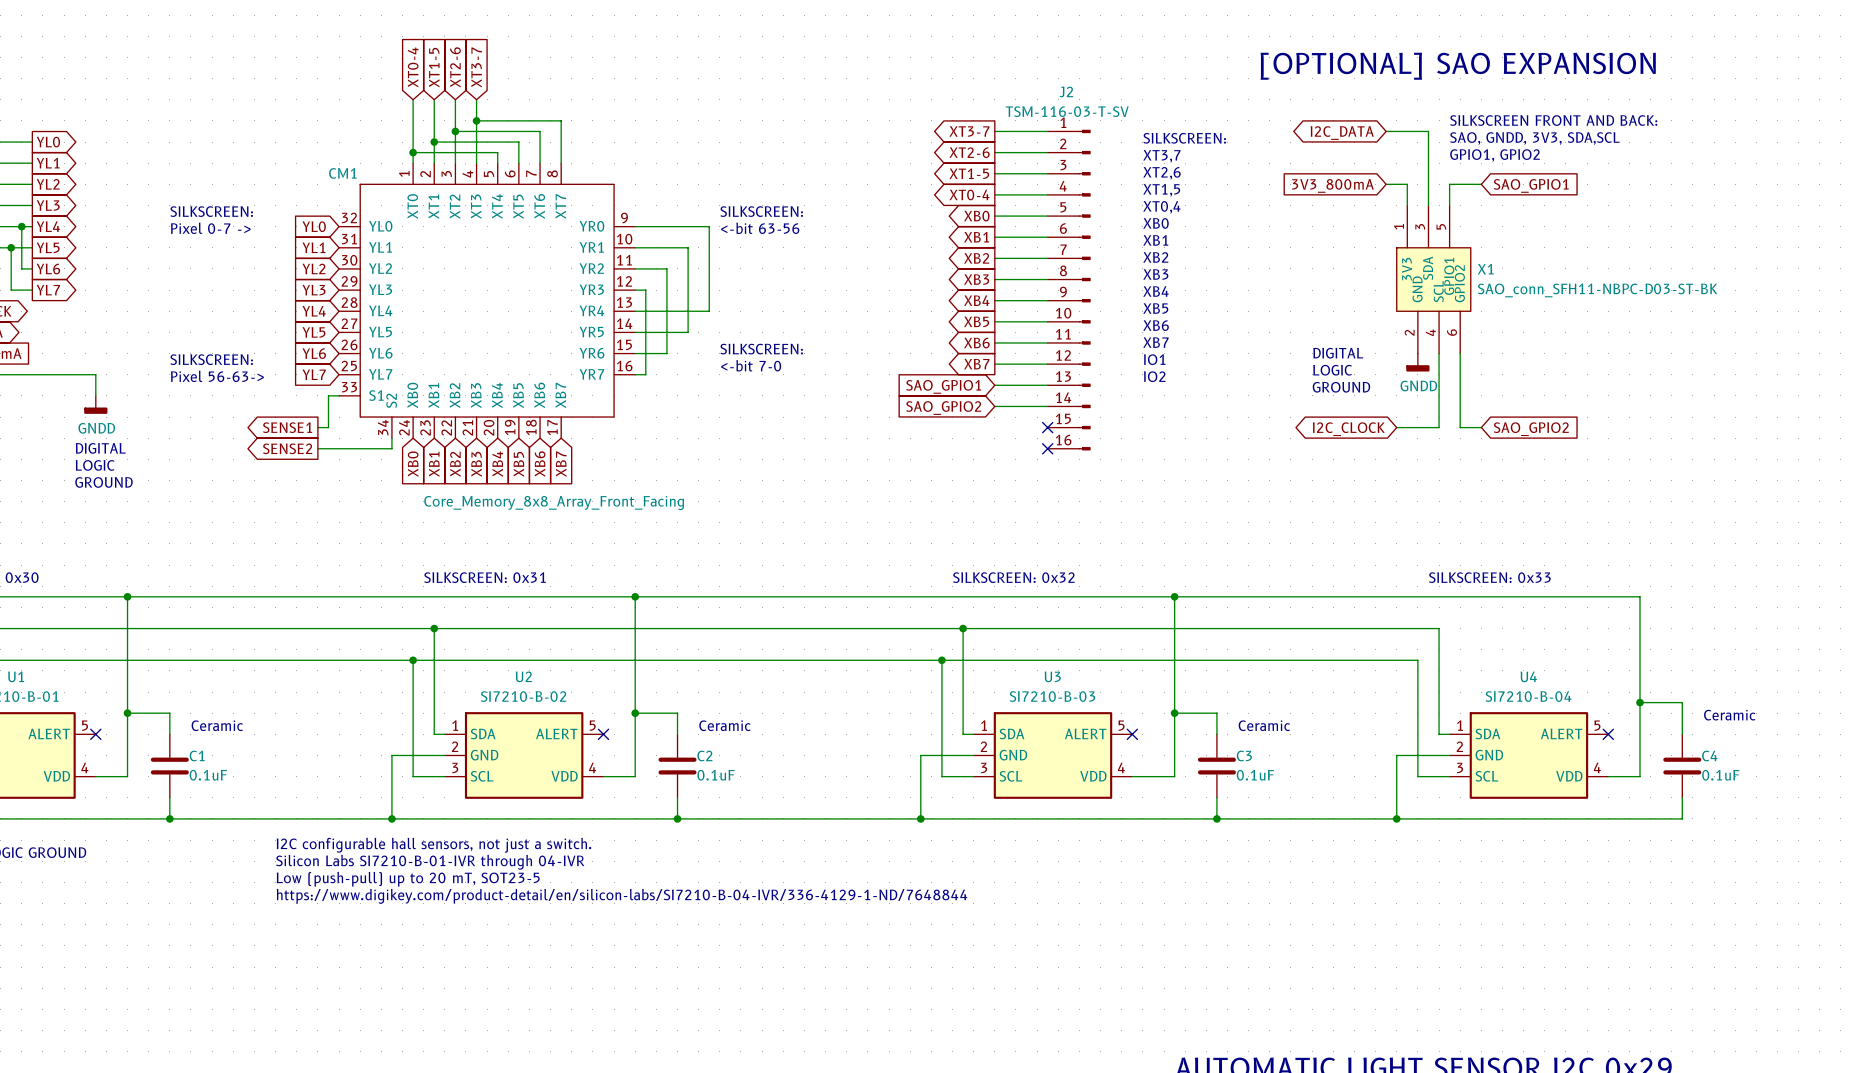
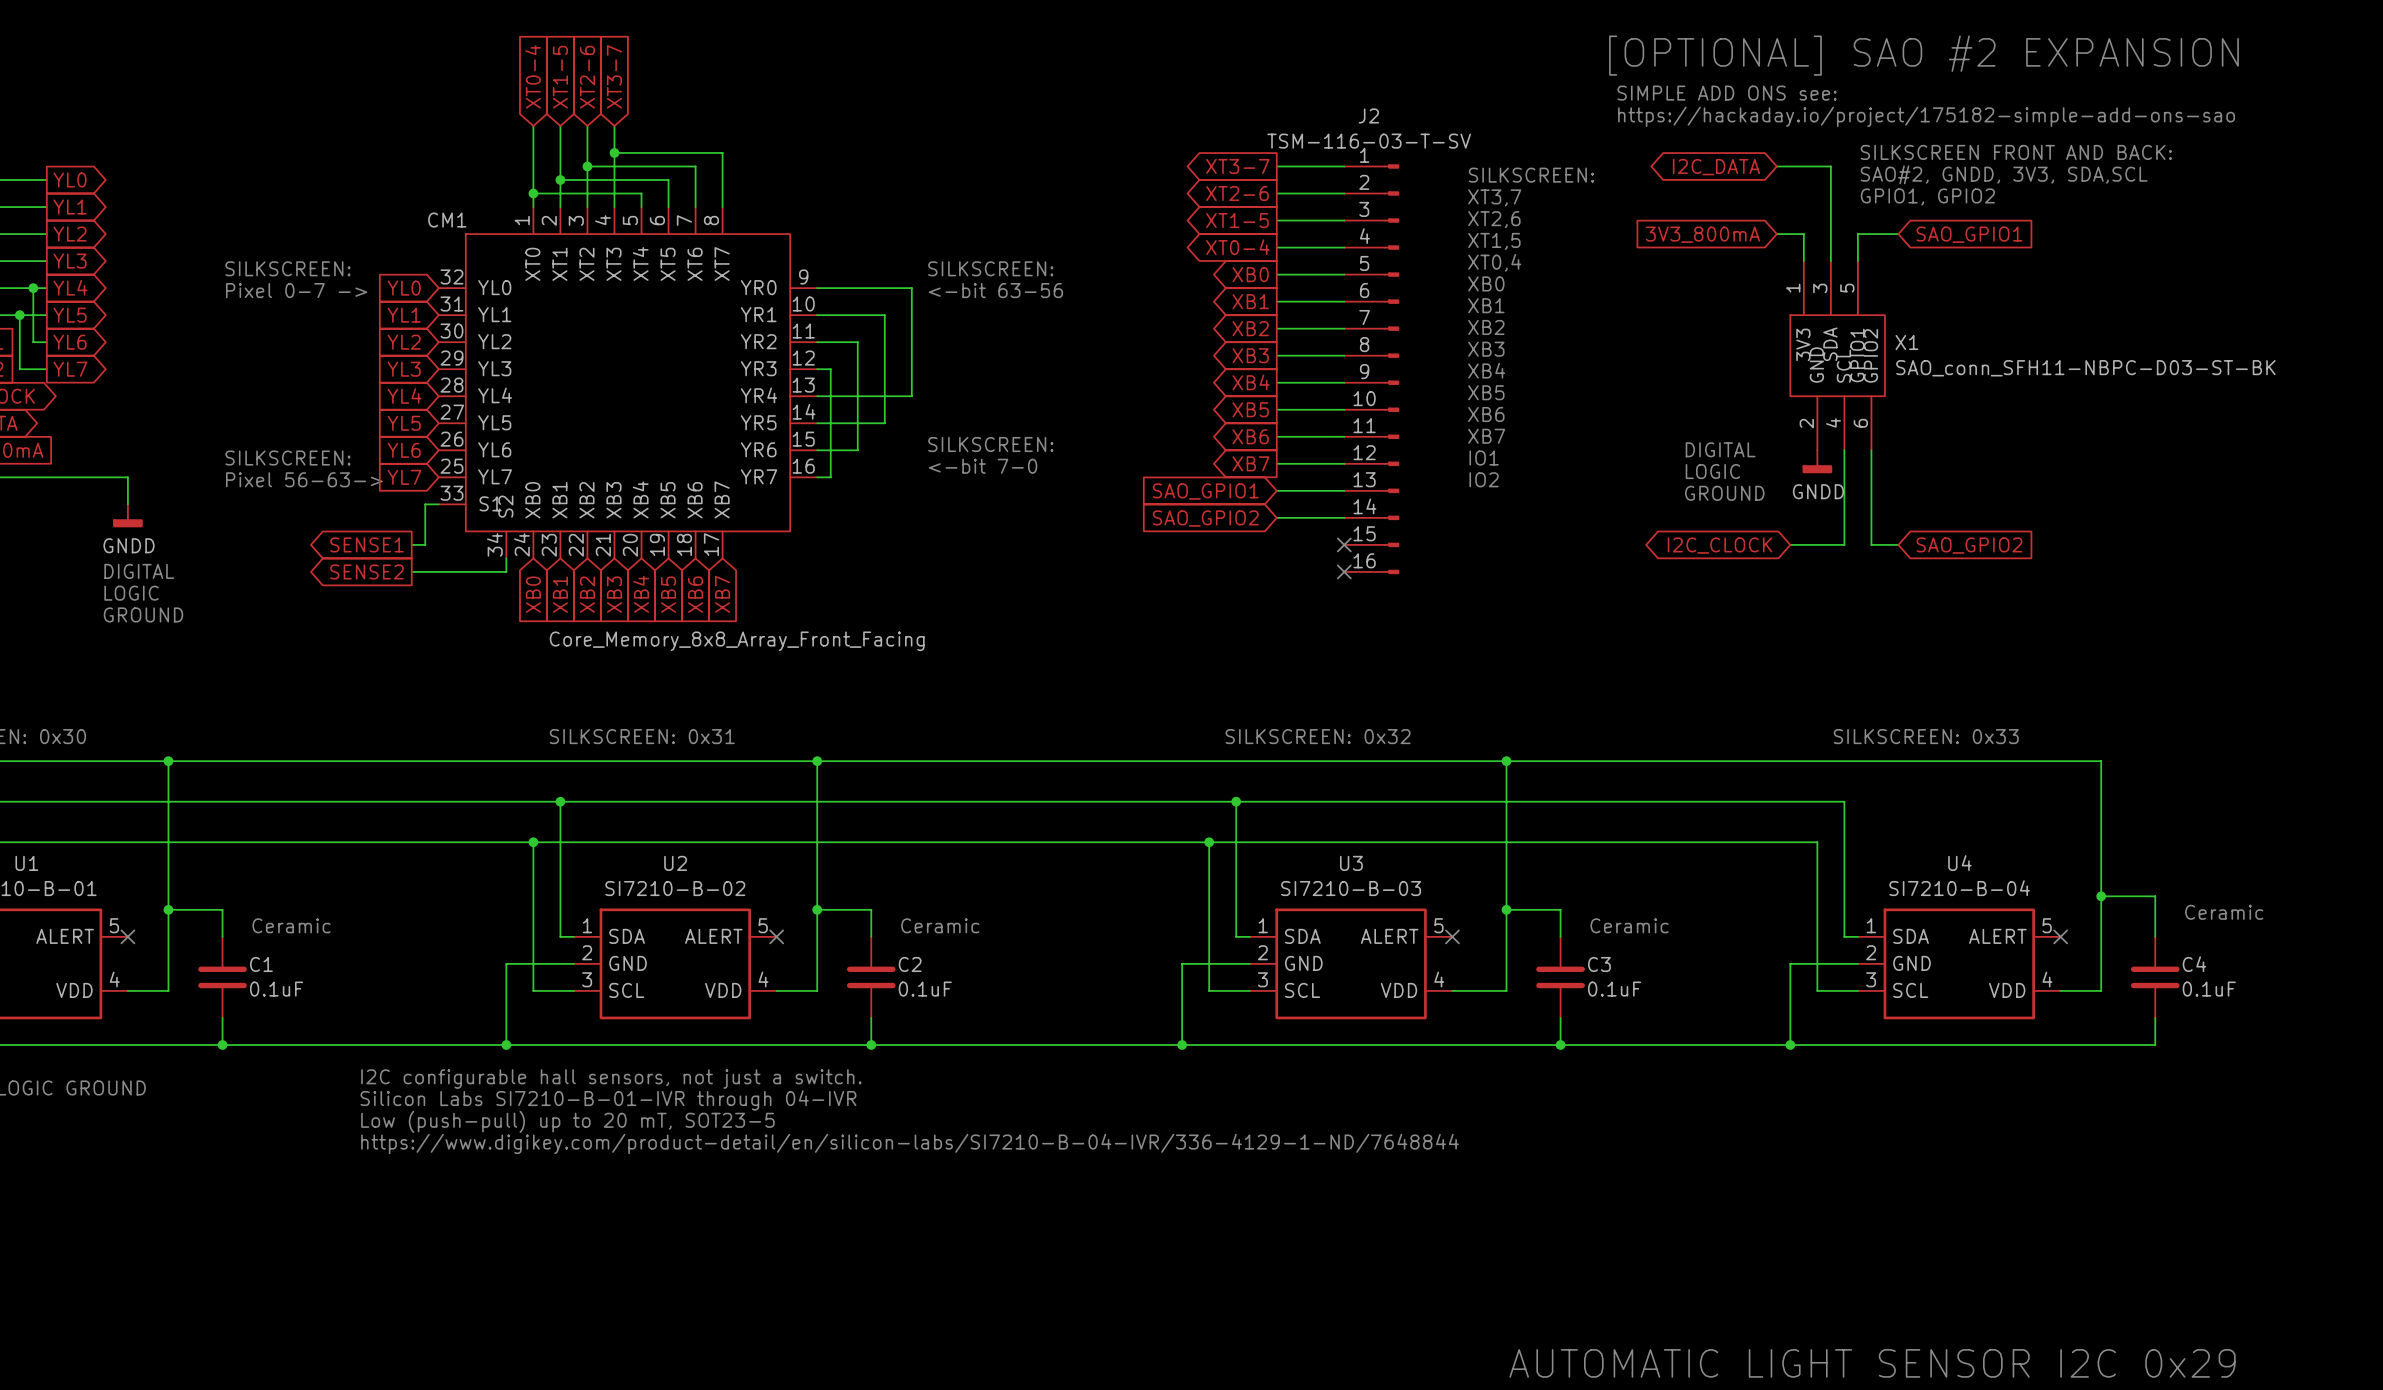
text: none -> [OPTIONAL] SAO #2 EXPANSION (1923, 55)
text: [OPTIONAL] SAO EXPANSION (1458, 66) -> SIMPLE ADD ONS see: (1727, 93)
text: none -> https://hackaday.io/project/175182-simple-add-ons-sao (1926, 116)
text: SAO, GNDD, 3V3, SDA,SCL (1534, 138) -> SAO#2, GNDD, 3V3, SDA,SCL (2004, 174)

